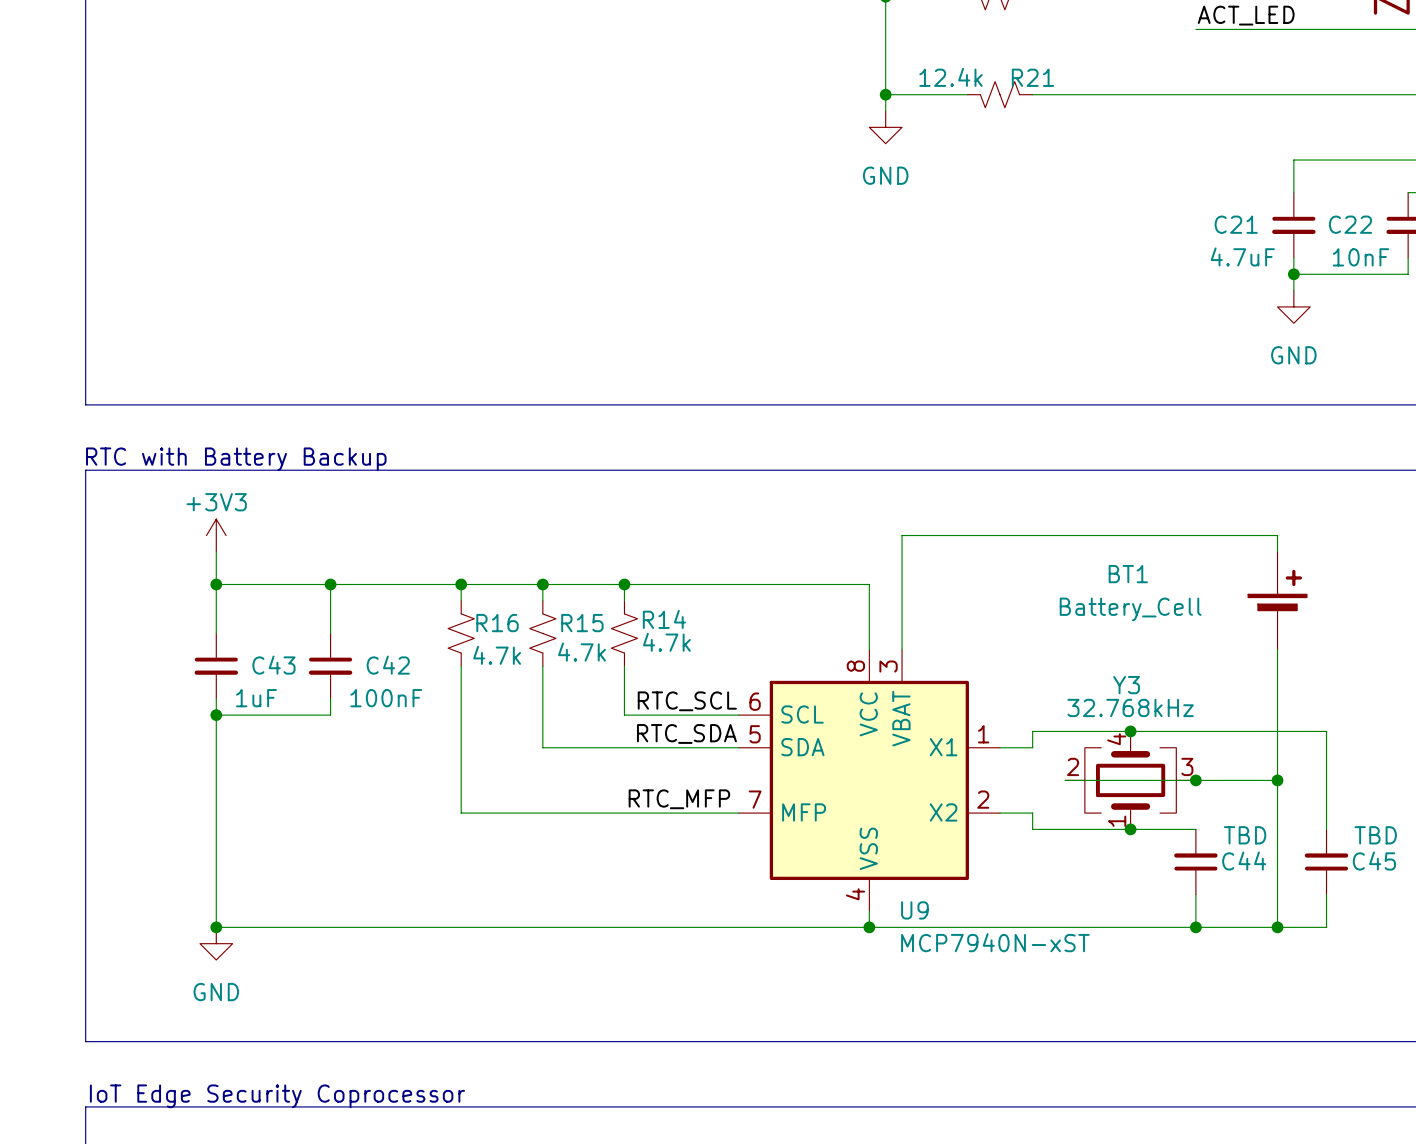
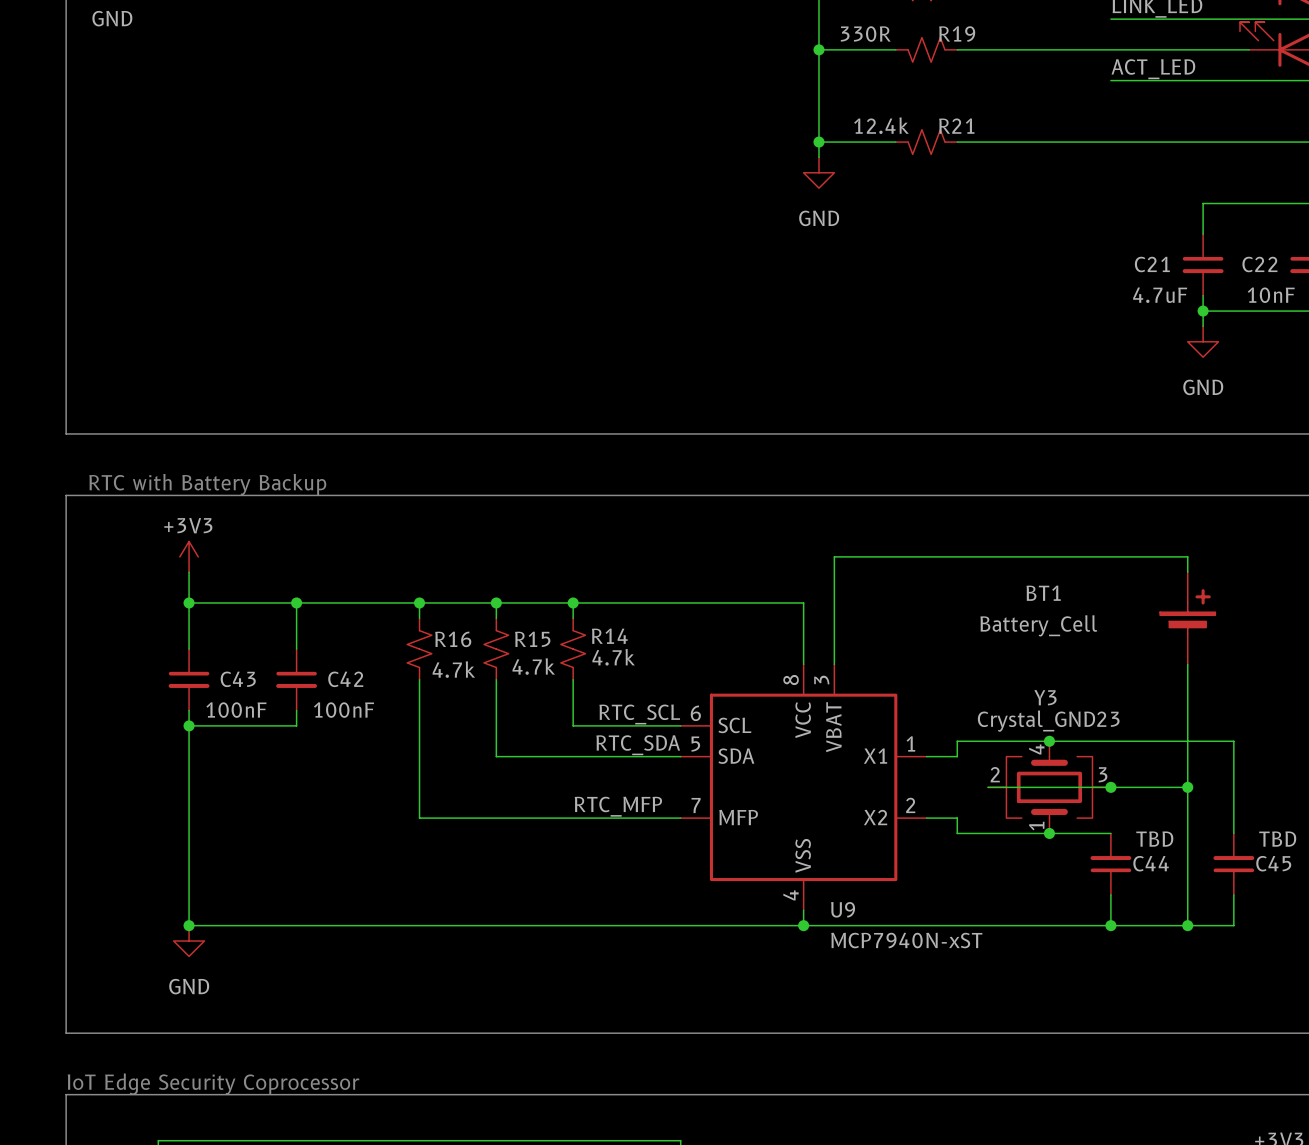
C43 value: 1uF (256, 698) -> 100nF (236, 710)
Y3 value: 32.768kHz (1130, 707) -> Crystal_GND23 (1048, 721)

